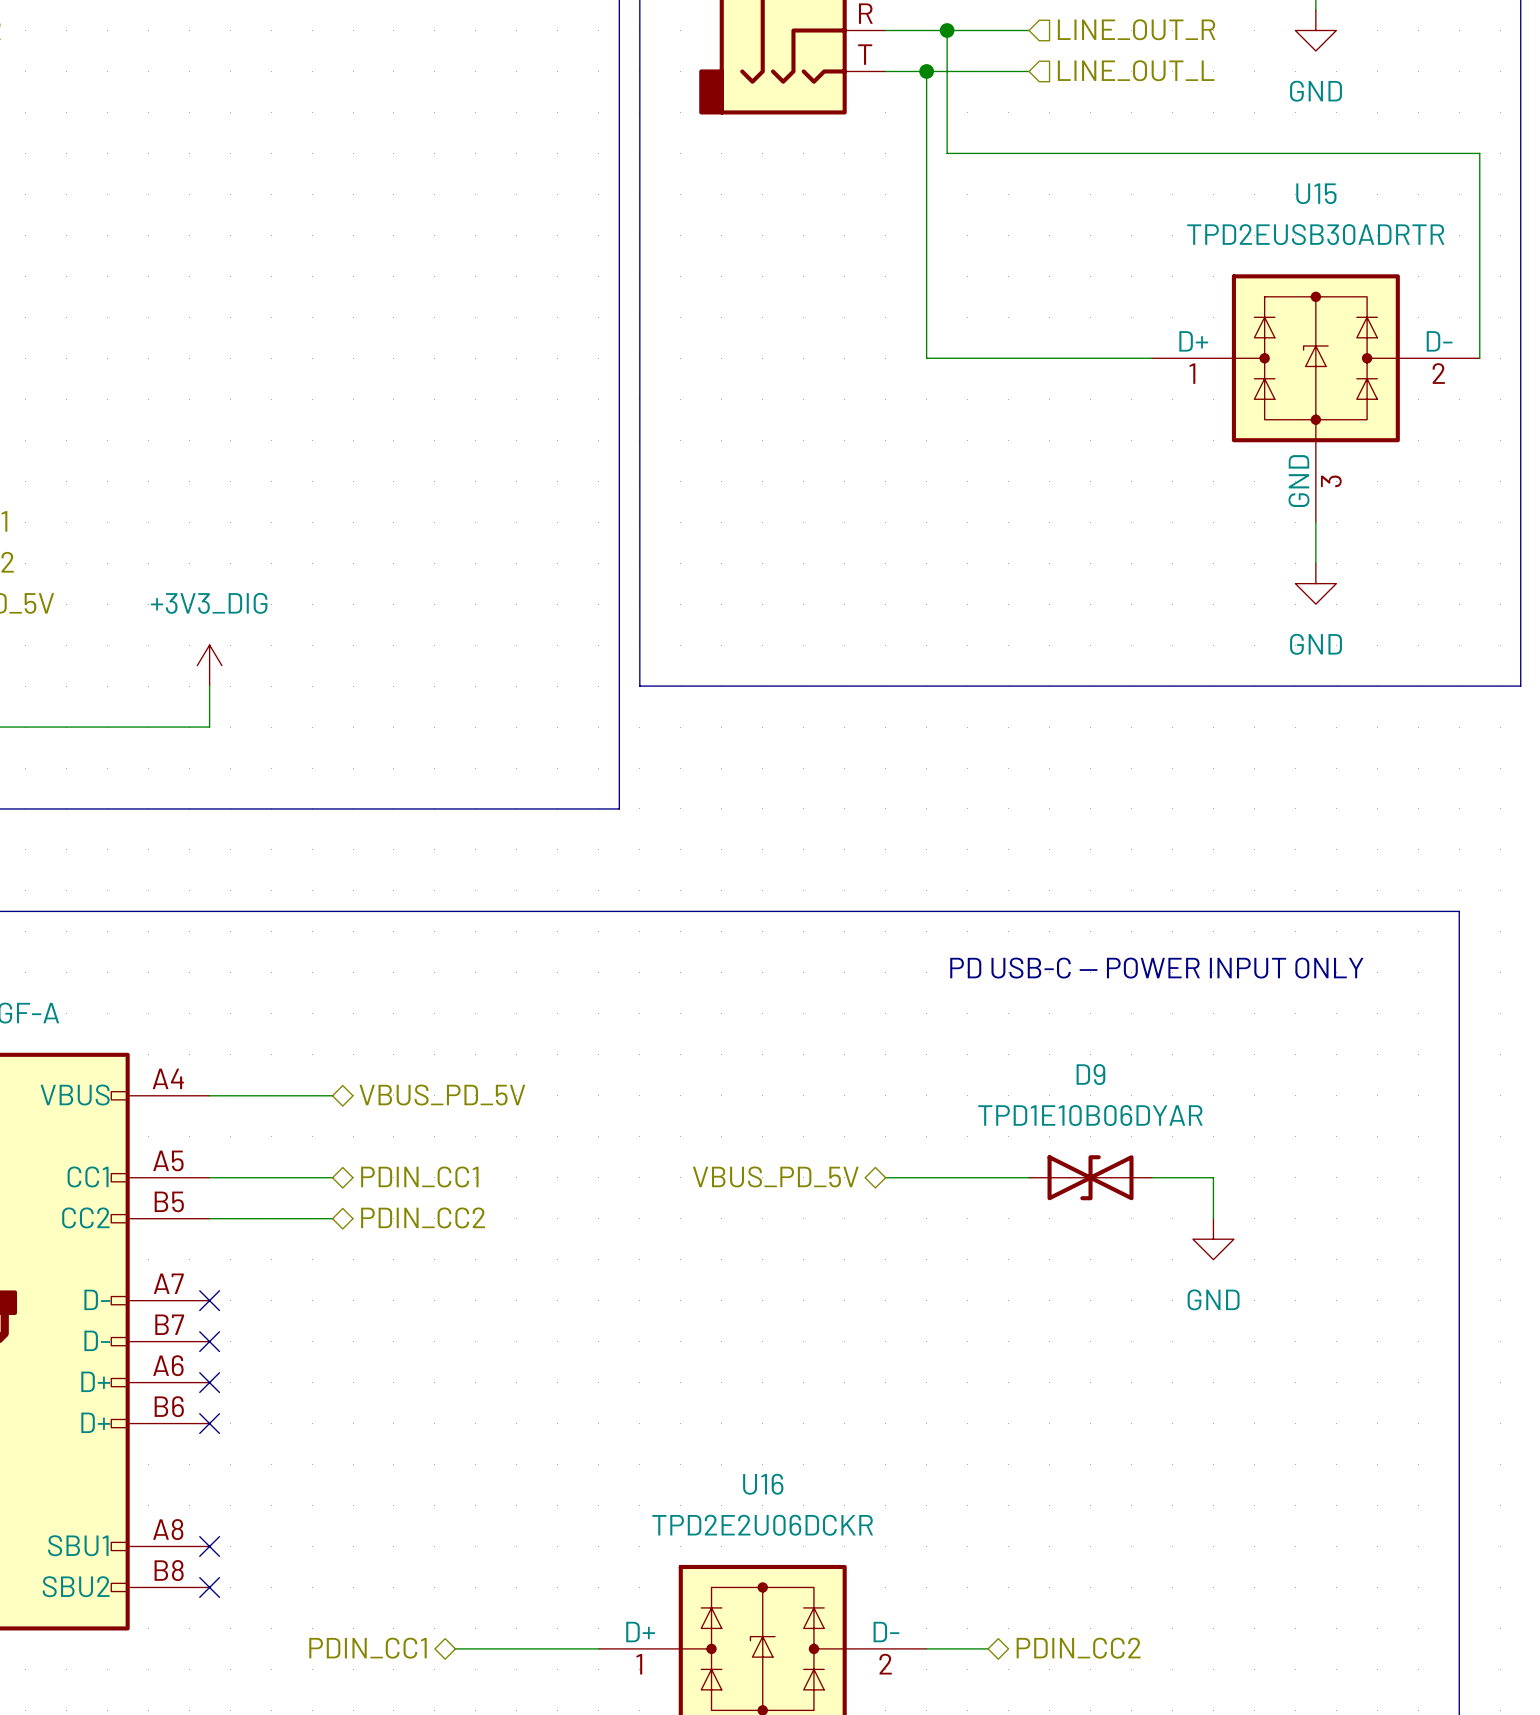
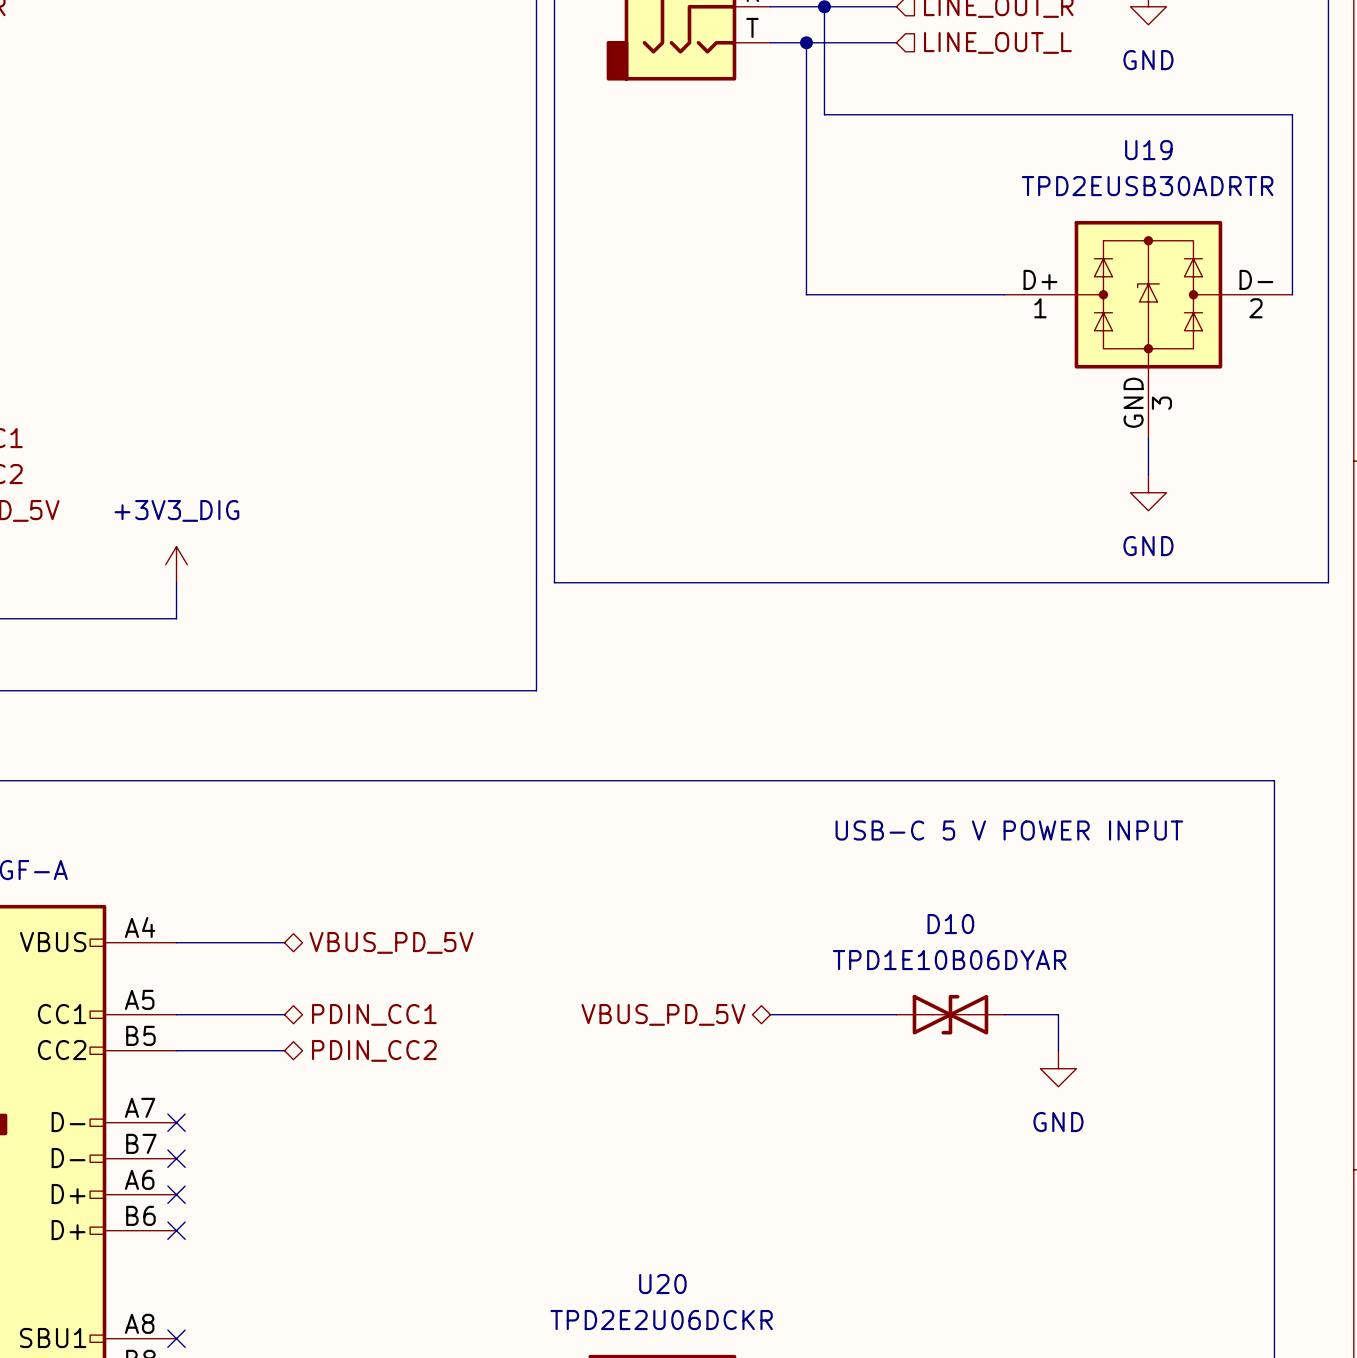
U15 name: U15 (1316, 193) -> U19 (1148, 150)
text: PD USB-C — POWER INPUT ONLY (1156, 968) -> USB-C 5 V POWER INPUT (1009, 830)
D9 name: D9 (1090, 1074) -> D10 (950, 924)
U16 name: U16 (763, 1484) -> U20 (662, 1284)

